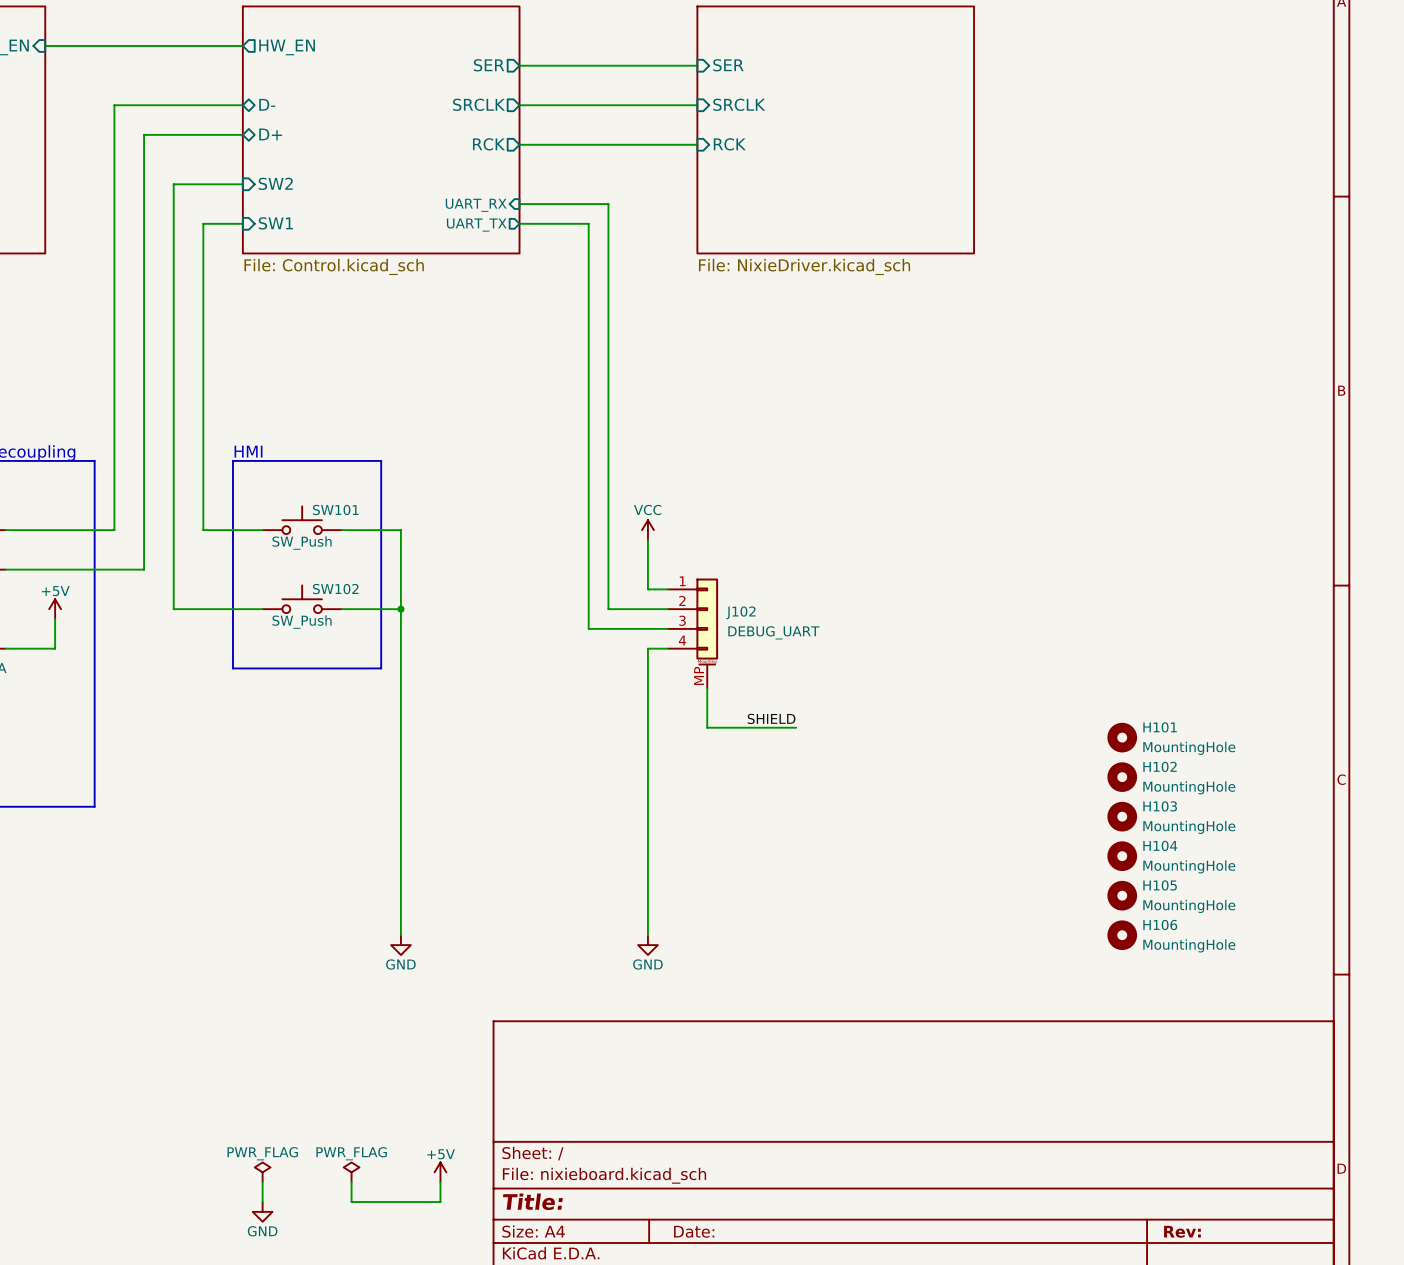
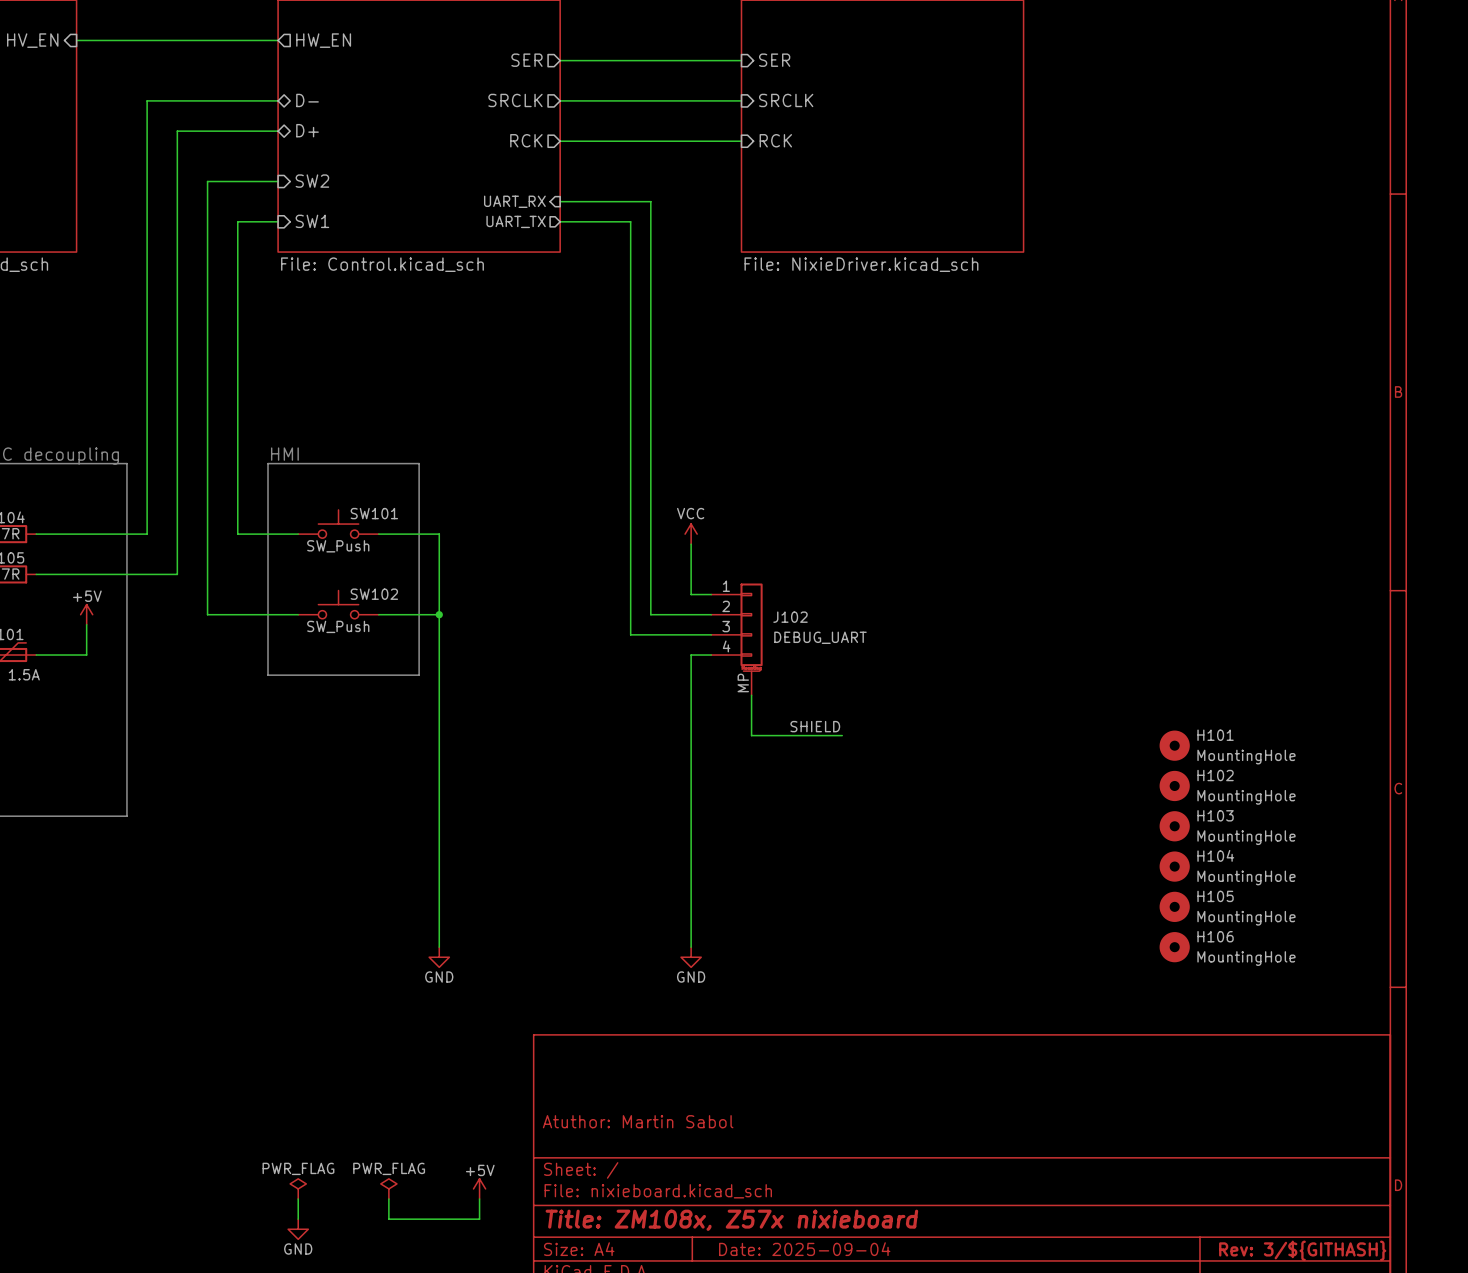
title block: none -> Atuthor: Martin Sabol (638, 1121)
title block: Title: (532, 1201) -> Title: ZM108x, Z57x nixieboard (731, 1220)
title block: Date: (694, 1231) -> Date: 2025-09-04 (804, 1249)
title block: Rev: (1182, 1231) -> Rev: 3/${GITHASH} (1302, 1250)

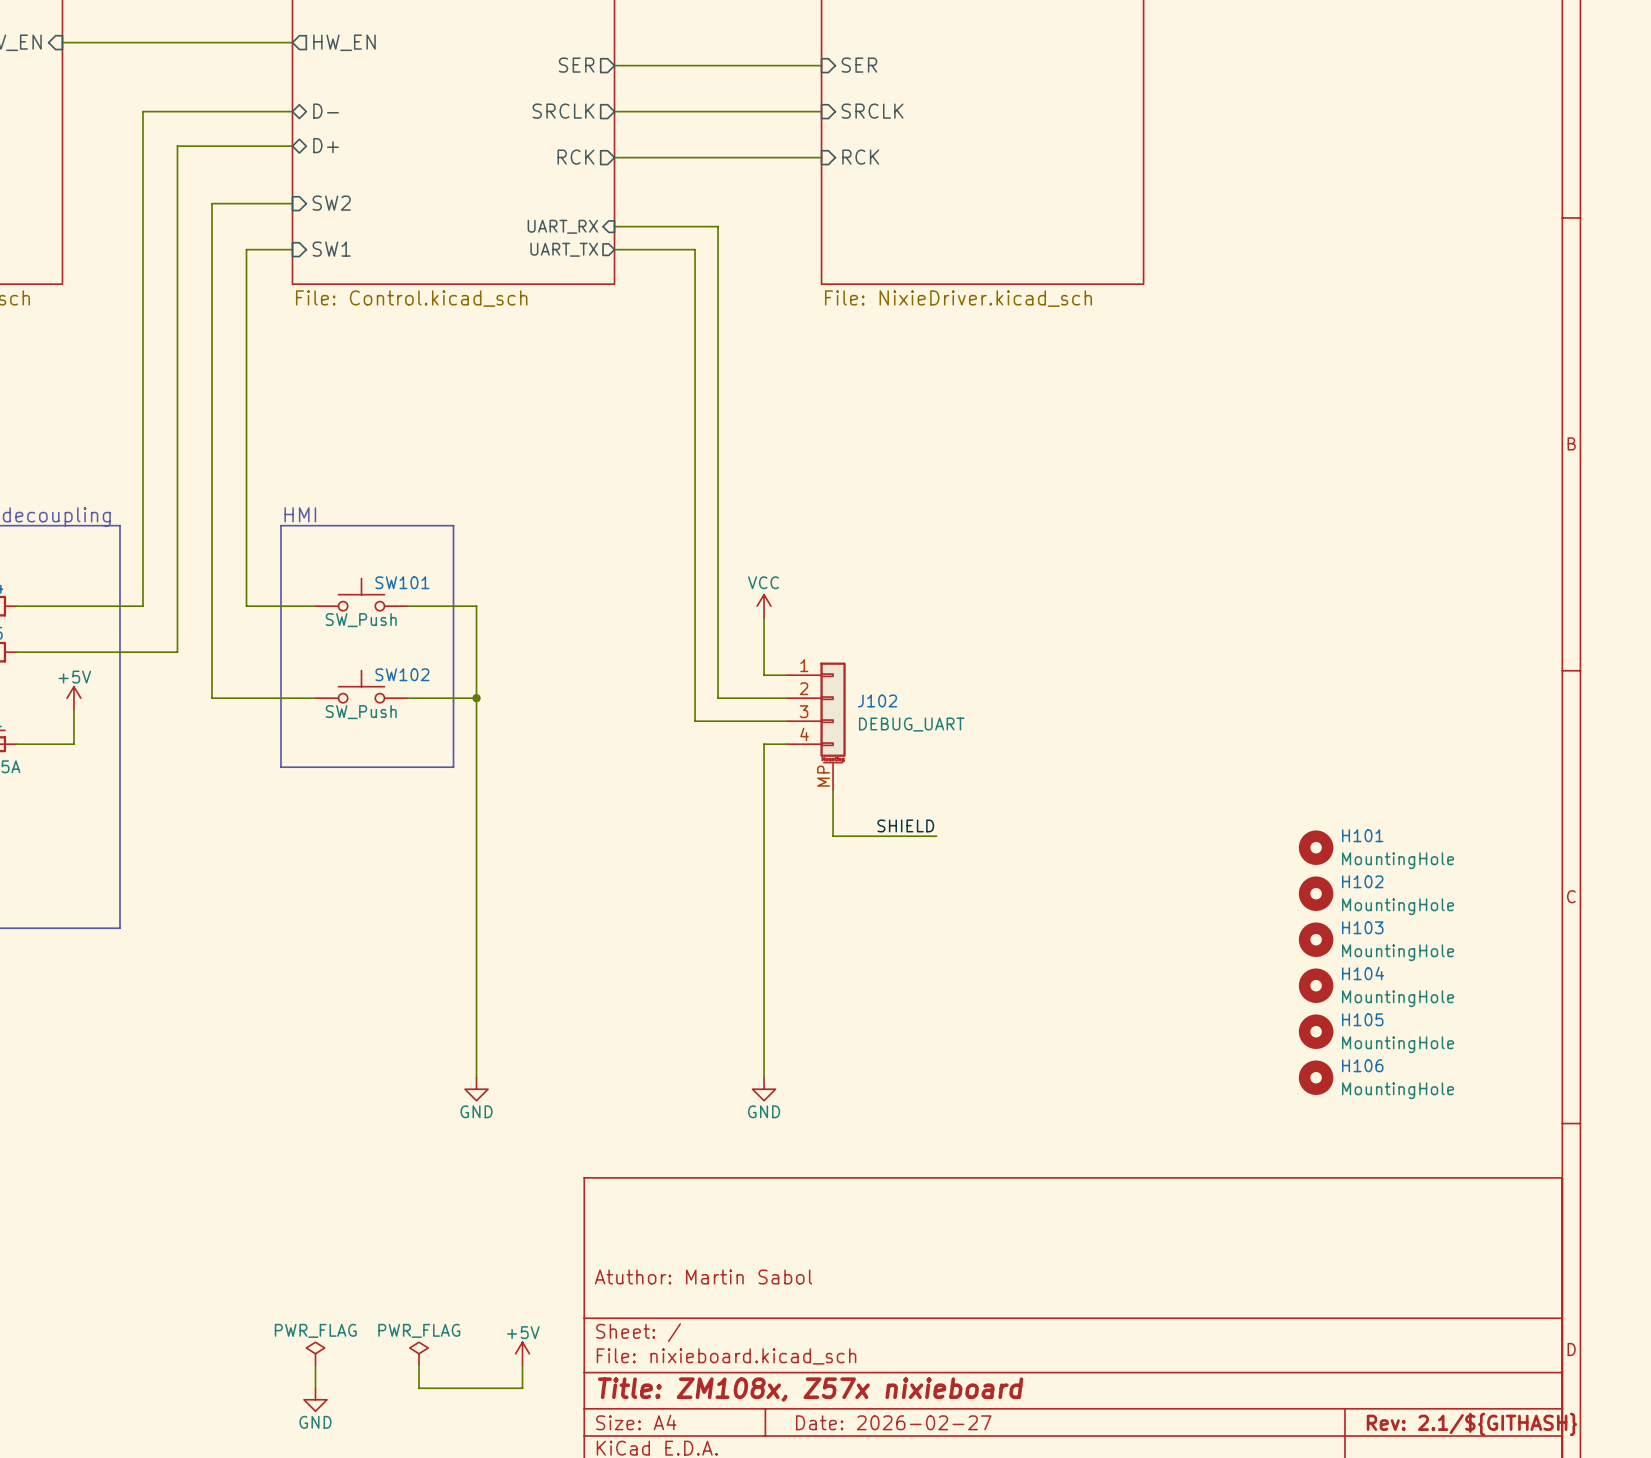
title block: Date: 2025-09-04 (804, 1249) -> Date: 2026-02-27 (893, 1422)
title block: Rev: 3/${GITHASH} (1302, 1250) -> Rev: 2.1/${GITHASH} (1471, 1424)

